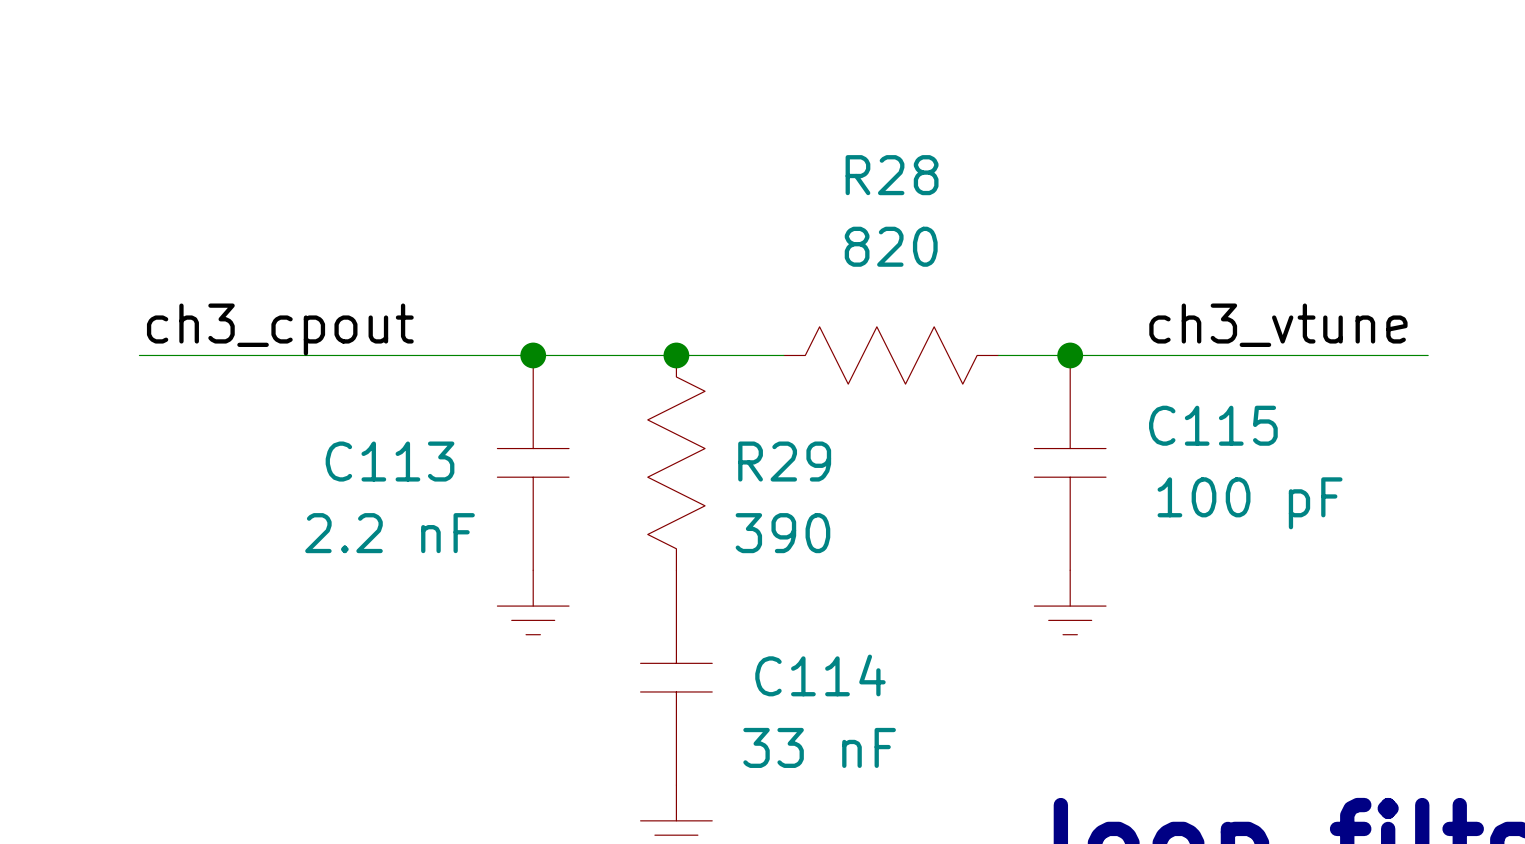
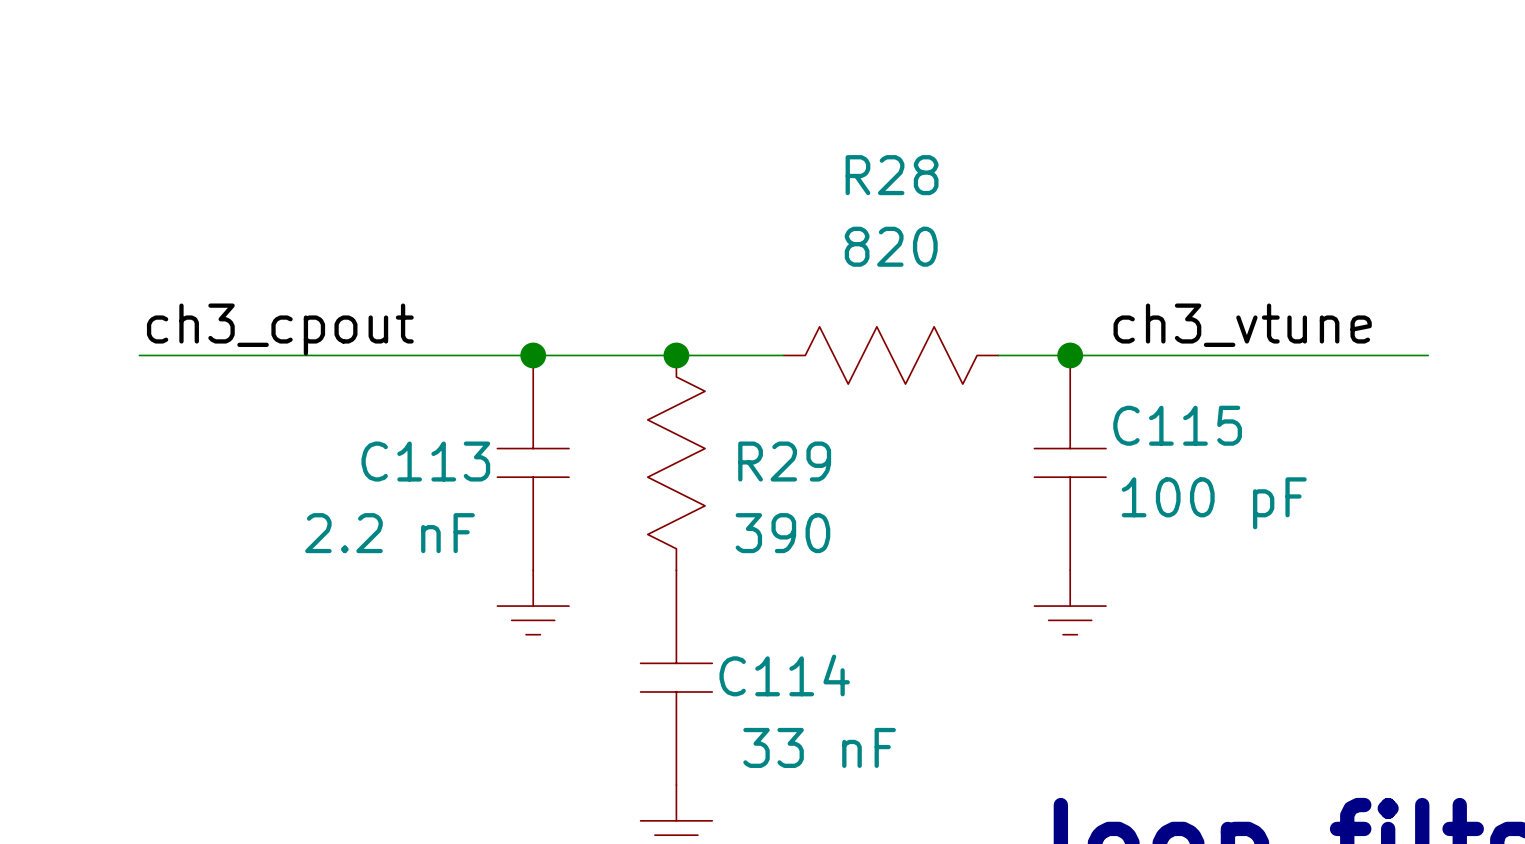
label position: ch3_vtune (1278, 325) -> ch3_vtune (1242, 325)
C115 name position: C115 (1213, 425) -> C115 (1177, 425)
C113 name position: C113 (390, 461) -> C113 (425, 461)
C115 value position: 100 pF (1250, 503) -> 100 pF (1214, 503)
C114 name position: C114 (820, 675) -> C114 (784, 675)

